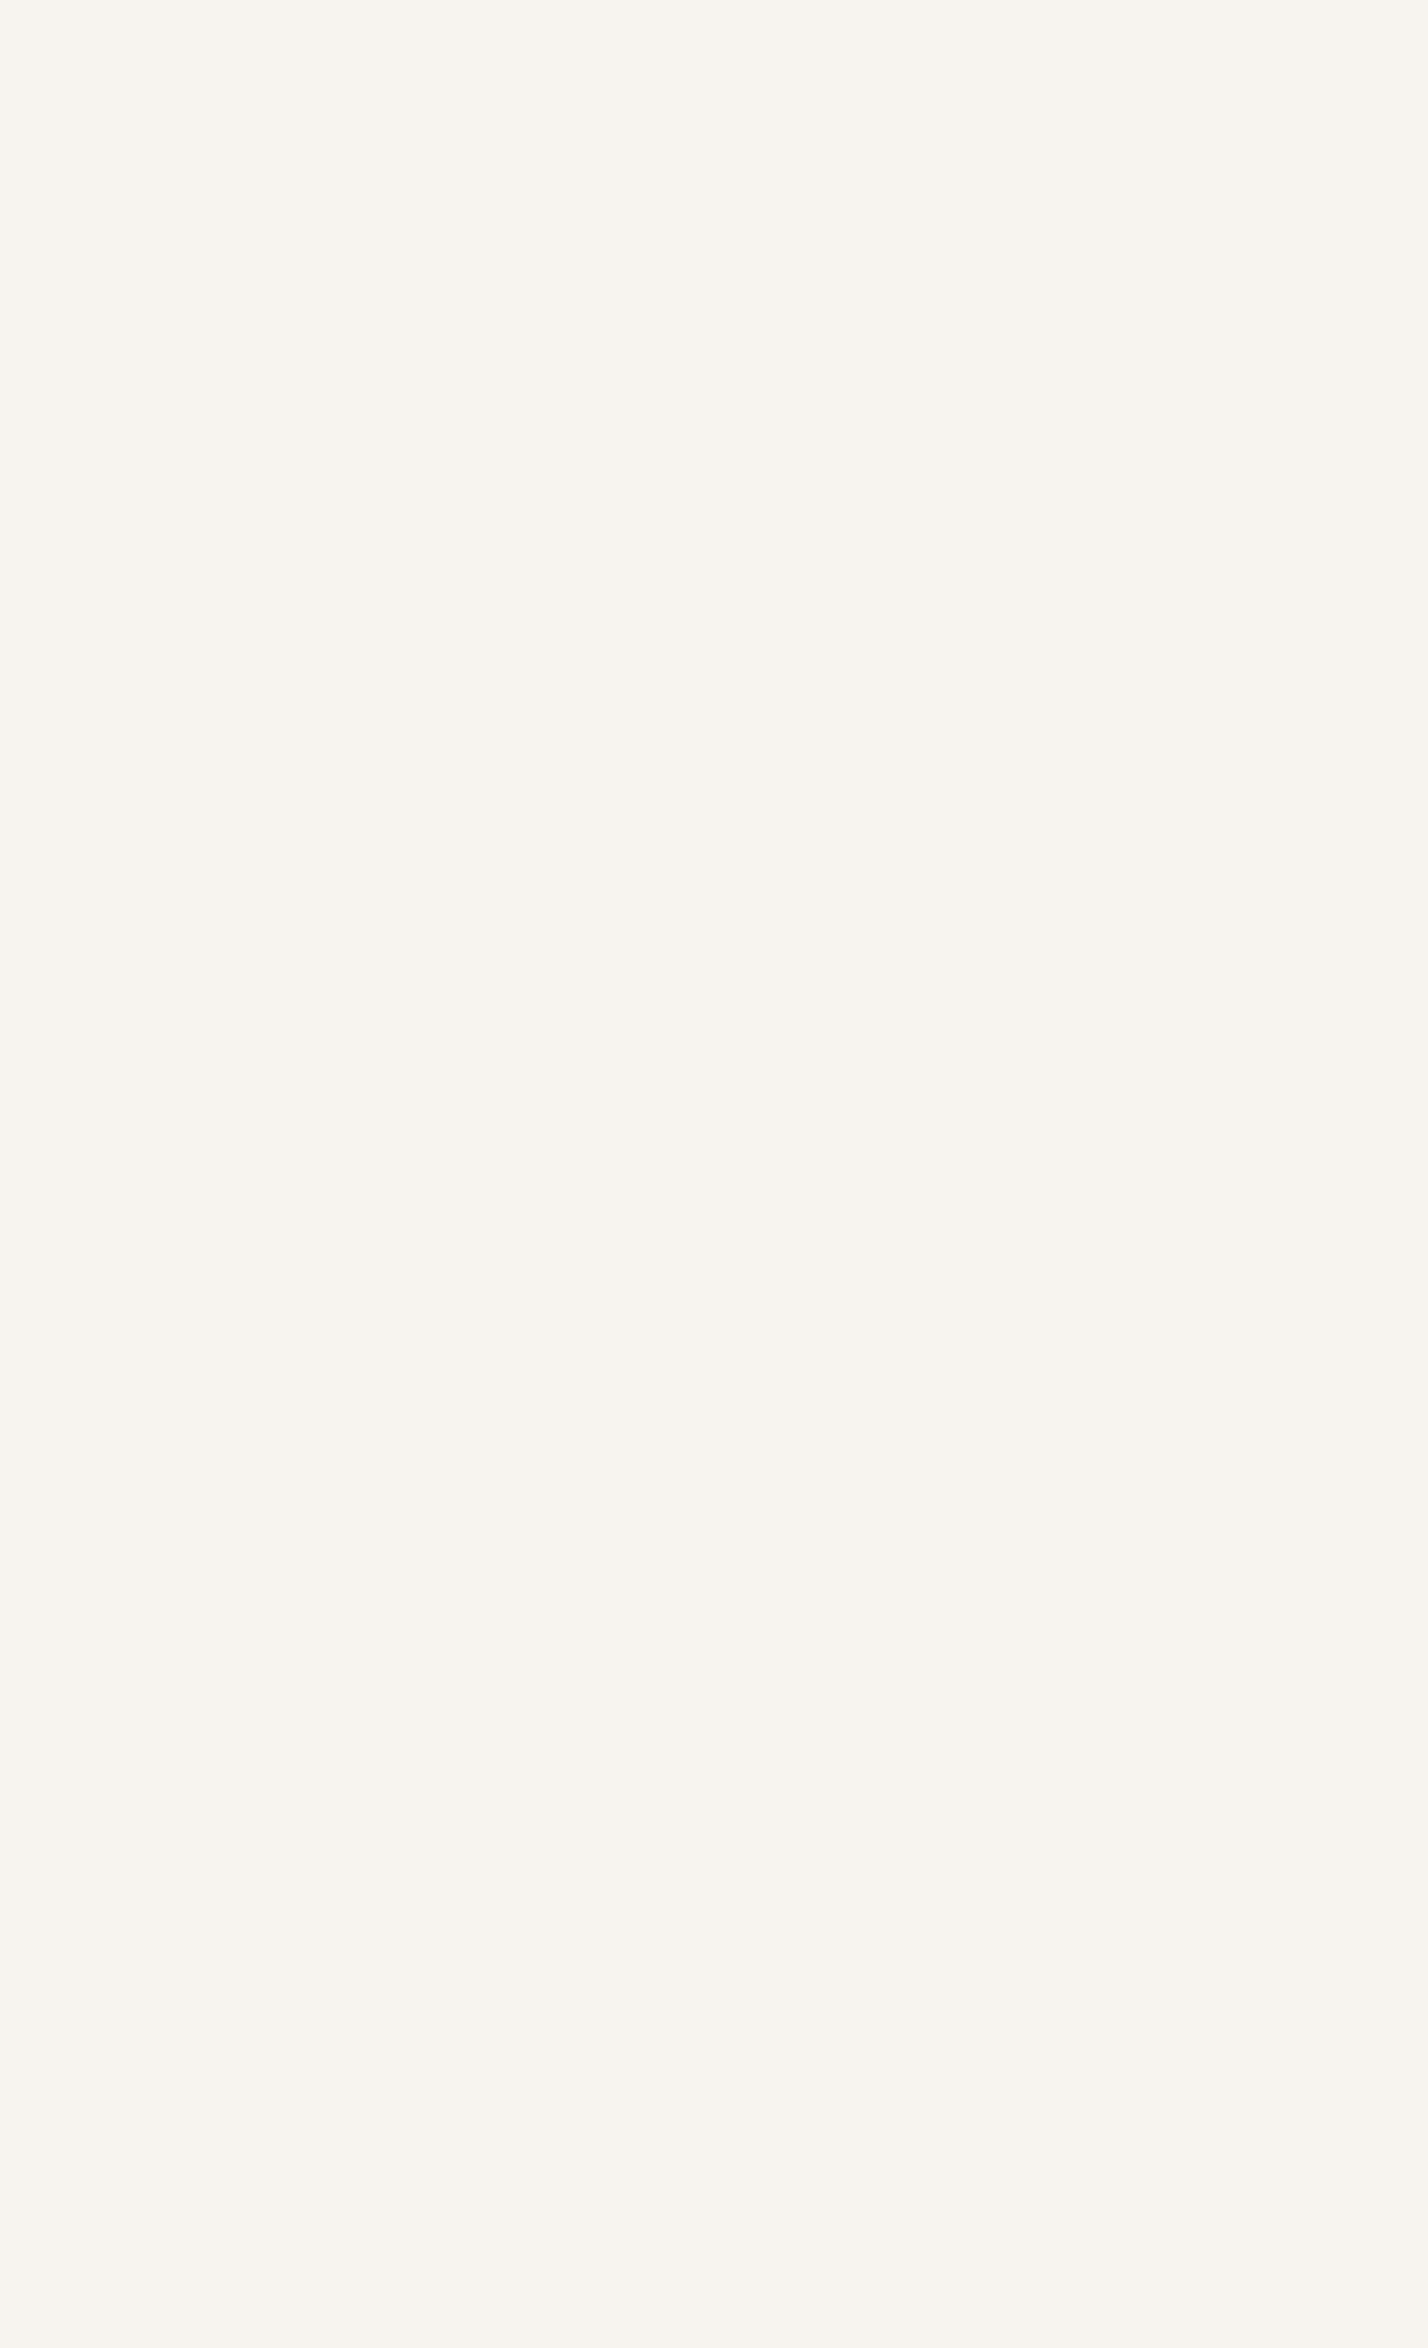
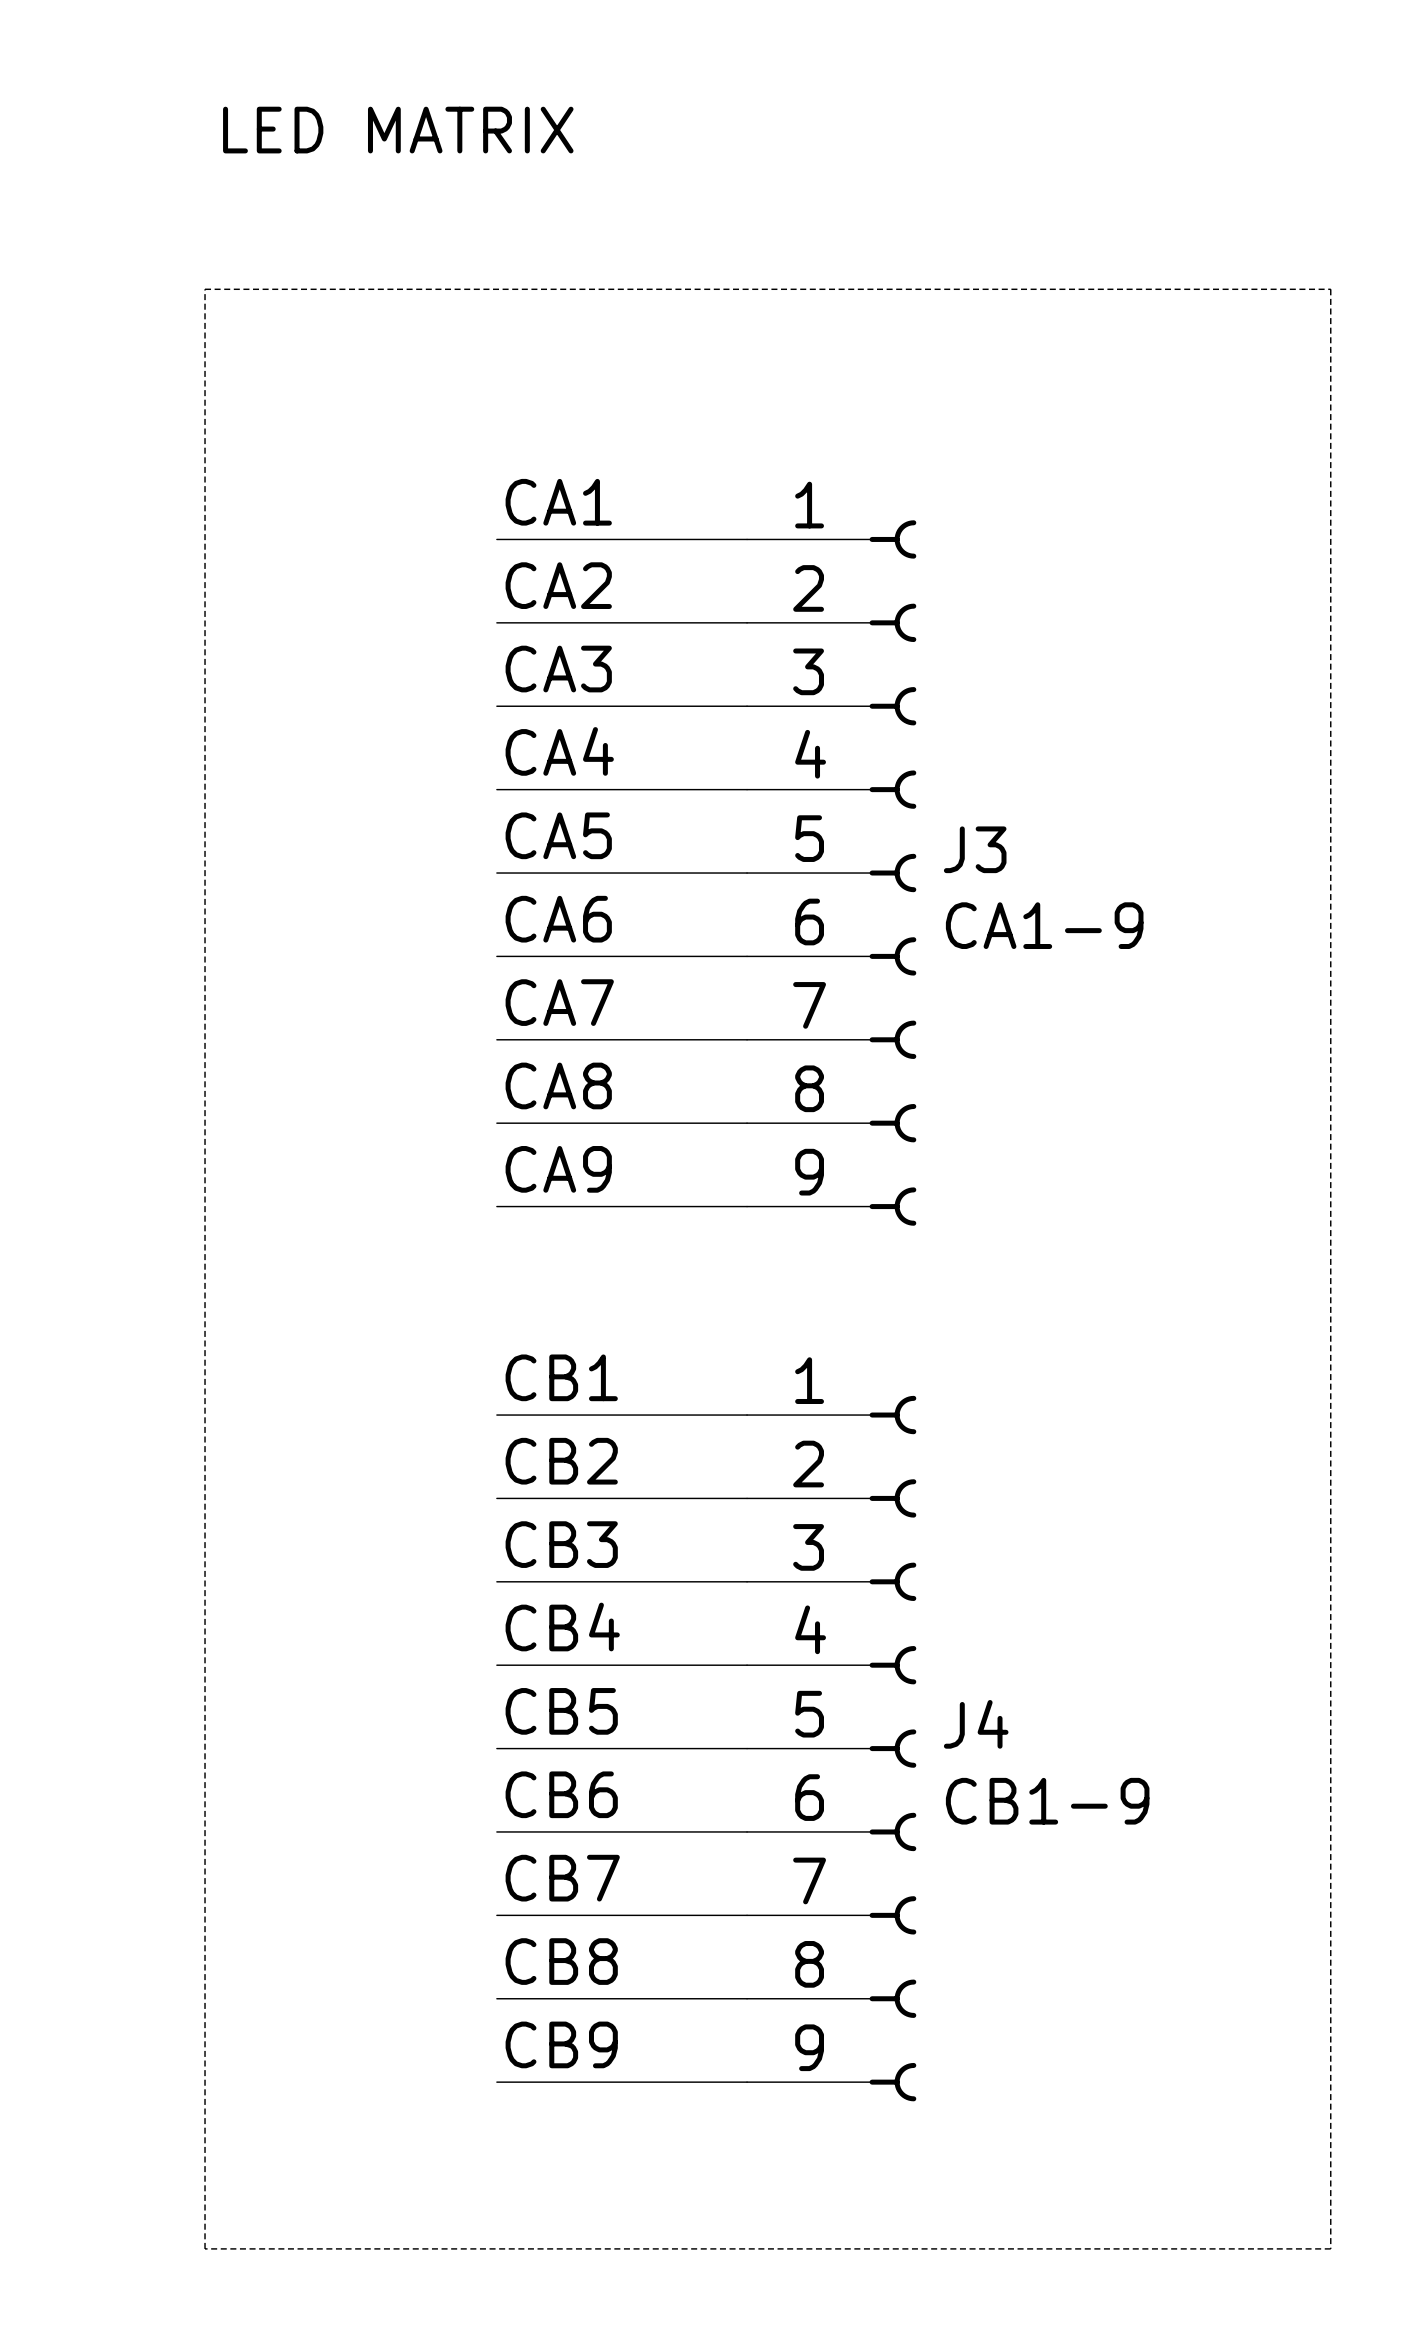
text: none -> LED MATRIX (398, 130)
line: none -> (205, 289) (1330, 289) (1330, 2248) (205, 2248) (205, 289)
label: none -> CA1 (558, 502)
wire: none -> (496, 539) (747, 539)
label: none -> CA2 (558, 585)
wire: none -> (496, 622) (747, 622)
label: none -> CA3 (558, 669)
wire: none -> (496, 706) (747, 706)
label: none -> CA4 (559, 751)
wire: none -> (496, 789) (747, 789)
label: none -> CA5 (558, 835)
wire: none -> (496, 873) (747, 873)
J3: none -> CA1-9 (831, 873)
label: none -> CA6 (558, 919)
wire: none -> (496, 956) (747, 956)
label: none -> CA7 (559, 1002)
wire: none -> (496, 1039) (747, 1039)
label: none -> CA8 (558, 1085)
wire: none -> (496, 1123) (747, 1123)
label: none -> CA9 (558, 1169)
wire: none -> (496, 1206) (747, 1206)
label: none -> CB1 (561, 1377)
wire: none -> (496, 1415) (747, 1415)
label: none -> CB2 (561, 1461)
wire: none -> (496, 1498) (747, 1498)
label: none -> CB3 (561, 1544)
wire: none -> (496, 1581) (747, 1581)
label: none -> CB4 (562, 1627)
wire: none -> (496, 1665) (747, 1665)
label: none -> CB5 (561, 1711)
wire: none -> (496, 1748) (747, 1748)
J4: none -> CB1-9 (831, 1748)
label: none -> CB6 (561, 1794)
wire: none -> (496, 1831) (747, 1831)
label: none -> CB7 (562, 1878)
wire: none -> (496, 1915) (747, 1915)
label: none -> CB8 (561, 1961)
wire: none -> (496, 1998) (747, 1998)
label: none -> CB9 (561, 2044)
wire: none -> (496, 2082) (747, 2082)

